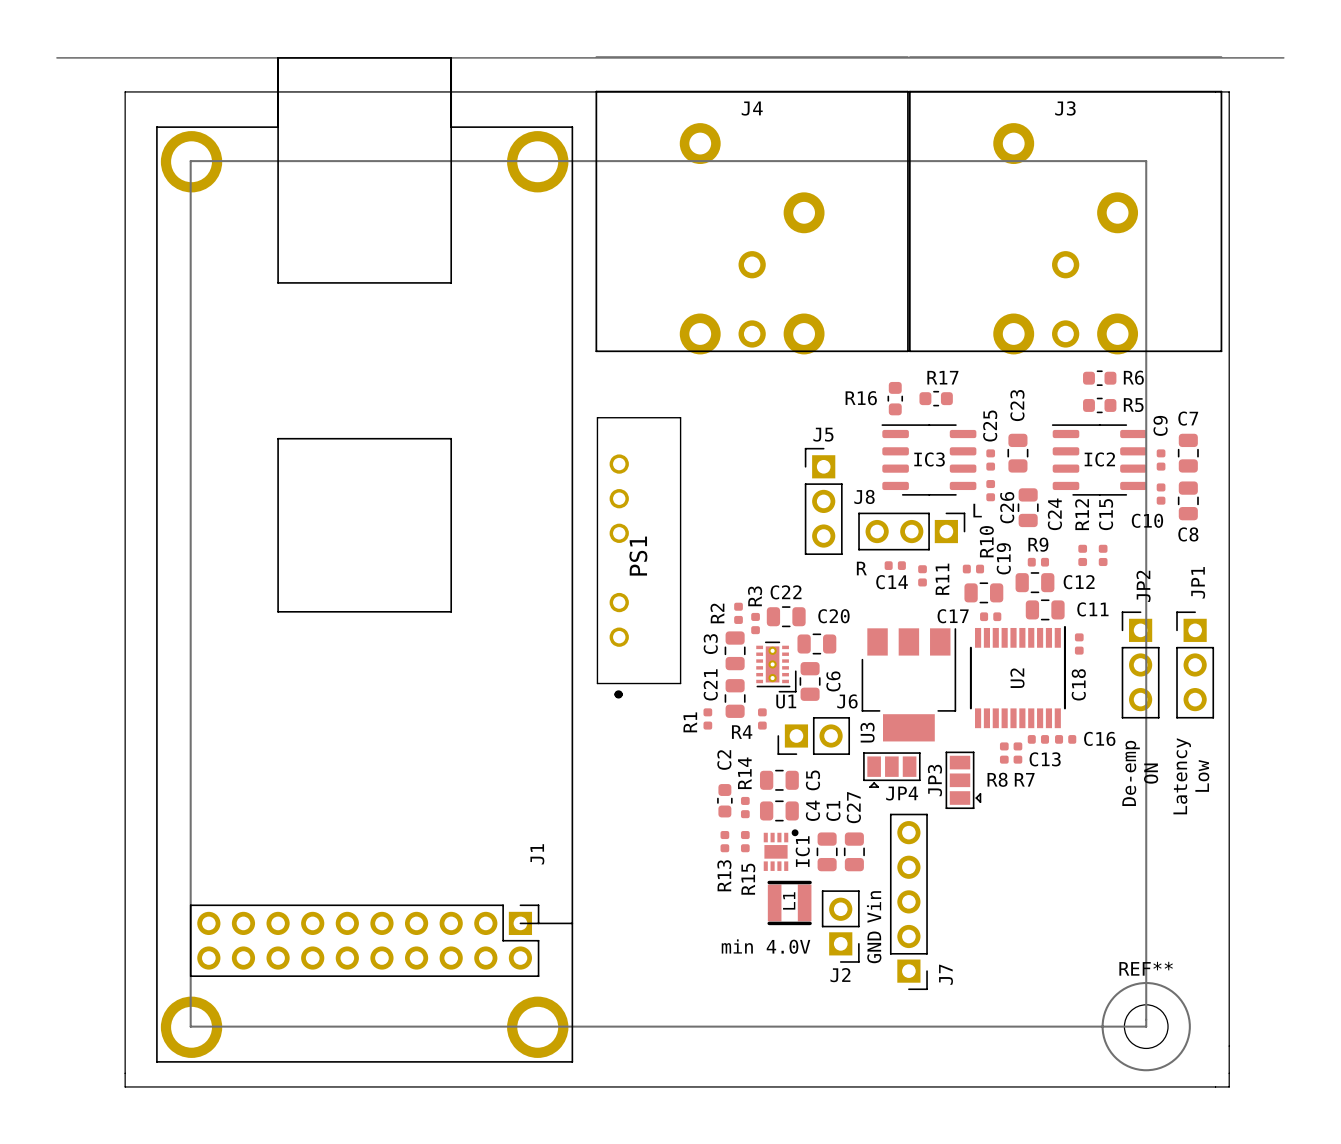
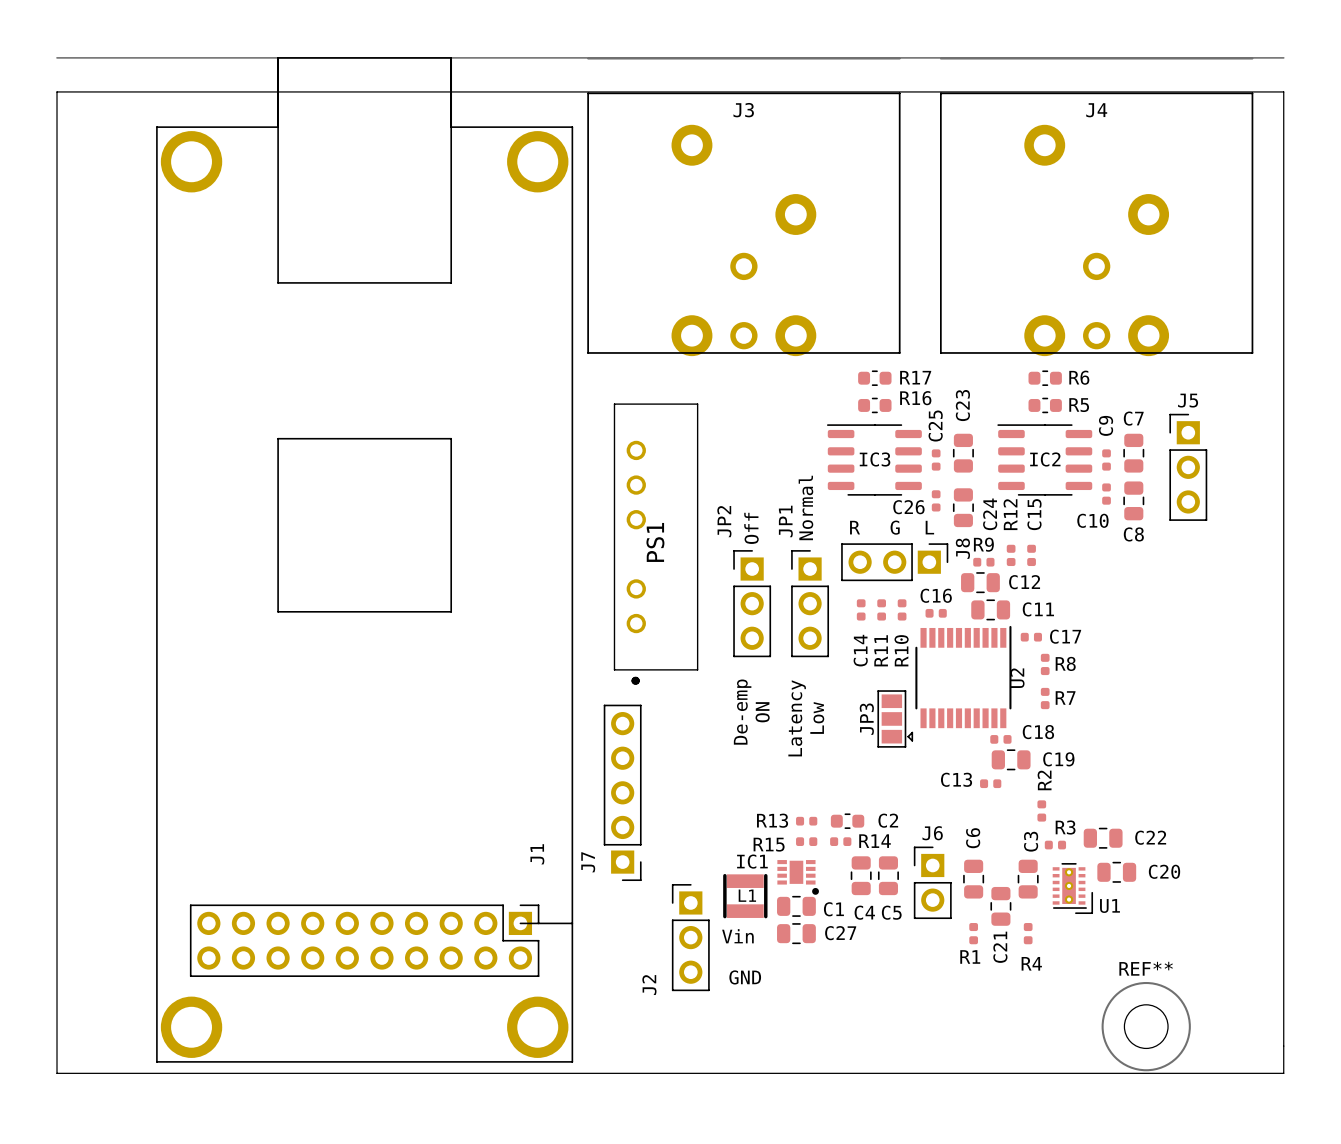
board edge: (125, 91) (125, 1086) (1229, 1086) (1229, 91) -> (125, 91) (57, 91) (57, 1073) (1283, 1073) (1283, 91) (1229, 91)
line: (190, 161) (190, 1026) (1146, 1026) (1146, 161) (190, 161) -> none
J4 position: (752, 205) -> (1096, 207)
J3 position: (1065, 205) -> (743, 207)
R17 name position: R17 (942, 377) -> R17 (915, 377)
R6 position: (1099, 378) -> (1045, 378)
R16 name position: R16 (861, 398) -> R16 (915, 398)
R16 rotation: 0° (895, 398) -> 90° clockwise (874, 405)
R16 position: (895, 398) -> (874, 405)
R17 position: (936, 398) -> (874, 378)
R5 position: (1099, 405) -> (1045, 405)
C23 position: (1017, 453) -> (963, 453)
C7 position: (1188, 453) -> (1133, 453)
IC3 position: (928, 459) -> (874, 459)
C25 position: (990, 459) -> (936, 459)
IC2 position: (1099, 459) -> (1044, 459)
C9 position: (1161, 459) -> (1106, 459)
C26 position: (990, 490) -> (936, 500)
C10 position: (1161, 494) -> (1106, 494)
J8 name rotation: 0° (864, 496) -> 90° counterclockwise (962, 548)
J8 name position: J8 (864, 496) -> J8 (962, 548)
C8 position: (1188, 500) -> (1133, 500)
J5 position: (823, 501) -> (1188, 467)
text: none -> Normal (805, 507)
C26 name rotation: 0° (1007, 507) -> 90° clockwise (908, 507)
C24 position: (1028, 507) -> (963, 507)
text position: L (977, 510) -> L (929, 527)
text: none -> G (895, 527)
text: none -> Off (751, 528)
J8 position: (911, 531) -> (894, 562)
R10 name position: R10 (986, 541) -> R10 (901, 650)
R12 position: (1082, 555) -> (1011, 555)
C15 position: (1103, 555) -> (1031, 555)
PS1 position: (639, 557) -> (656, 544)
C19 name rotation: 0° (1003, 558) -> 90° clockwise (1058, 759)
R9 position: (1038, 562) -> (983, 562)
C14 rotation: 0° (895, 565) -> 90° clockwise (861, 609)
C14 position: (895, 565) -> (861, 609)
text position: R (861, 568) -> R (855, 527)
R10 rotation: 0° (973, 569) -> 90° clockwise (902, 609)
R10 position: (973, 569) -> (902, 609)
R11 position: (922, 575) -> (881, 609)
R11 name position: R11 (942, 579) -> R11 (881, 650)
C12 position: (1034, 582) -> (980, 582)
JP1 name position: JP1 (1198, 582) -> JP1 (785, 521)
JP2 name position: JP2 (1143, 586) -> JP2 (724, 521)
C22 name position: C22 (786, 592) -> C22 (1150, 837)
C19 position: (983, 592) -> (1011, 759)
C11 position: (1045, 609) -> (990, 609)
R2 name position: R2 (717, 613) -> R2 (1044, 780)
R2 position: (738, 613) -> (1041, 810)
C22 position: (786, 616) -> (1103, 838)
C20 name position: C20 (833, 616) -> C20 (1164, 871)
C17 name position: C17 (953, 616) -> C17 (1065, 636)
C17 position: (990, 616) -> (1031, 637)
R3 rotation: 0° (755, 623) -> 90° clockwise (1055, 845)
R3 position: (755, 623) -> (1055, 845)
C20 position: (816, 643) -> (1116, 872)
C18 rotation: 0° (1079, 643) -> 90° clockwise (1000, 739)
C18 position: (1079, 643) -> (1000, 739)
C3 name position: C3 (710, 644) -> C3 (1031, 841)
C3 position: (735, 650) -> (1028, 879)
JP2 position: (1140, 664) -> (752, 603)
JP1 position: (1195, 664) -> (810, 603)
U1 position: (776, 667) -> (1072, 888)
U2 position: (1017, 677) -> (963, 677)
C6 position: (810, 681) -> (973, 879)
C6 name position: C6 (833, 681) -> C6 (973, 838)
C21 name position: C21 (710, 684) -> C21 (1000, 947)
U3: (908, 684) -> none
C18 name position: C18 (1078, 684) -> C18 (1038, 732)
C21 position: (735, 698) -> (1000, 906)
U1 name position: U1 (786, 701) -> U1 (1109, 906)
J6 name position: J6 (847, 701) -> J6 (932, 833)
text: none -> De-emp (742, 712)
text: none -> ON (762, 712)
text: none -> Low (817, 717)
R1 position: (707, 718) -> (973, 933)
R4 position: (762, 718) -> (1028, 933)
text: none -> Latency (797, 718)
R1 name rotation: 0° (690, 722) -> 90° clockwise (970, 956)
R4 name position: R4 (742, 732) -> R4 (1031, 963)
J6 rotation: 0° (813, 735) -> 90° clockwise (932, 882)
J6 position: (813, 735) -> (932, 882)
C16 name position: C16 (1099, 738) -> C16 (936, 595)
C13 position: (1038, 739) -> (990, 783)
C16 position: (1065, 739) -> (936, 613)
R8 position: (1004, 753) -> (1045, 664)
R7 position: (1017, 753) -> (1045, 698)
C13 name position: C13 (1045, 759) -> C13 (956, 779)
JP4: (891, 770) -> none
text: De-emp (1131, 773) -> none
text: ON (1151, 773) -> none
text: Low (1202, 775) -> none
text: Latency (1182, 776) -> none
R8 name position: R8 (997, 779) -> R8 (1065, 663)
R7 name position: R7 (1024, 779) -> R7 (1065, 698)
C5 rotation: 0° (779, 780) -> 90° clockwise (888, 875)
C5 position: (779, 780) -> (888, 875)
JP3 position: (963, 780) -> (895, 718)
C2 rotation: 0° (724, 800) -> 90° clockwise (847, 821)
C2 position: (724, 800) -> (847, 821)
R14 rotation: 0° (745, 807) -> 90° clockwise (840, 841)
R14 position: (745, 807) -> (840, 841)
C4 rotation: 0° (779, 810) -> 90° clockwise (861, 875)
C4 position: (779, 810) -> (861, 875)
R13 rotation: 0° (724, 841) -> 90° clockwise (806, 821)
R13 position: (724, 841) -> (806, 821)
R15 rotation: 0° (745, 841) -> 90° clockwise (806, 841)
R15 position: (745, 841) -> (806, 841)
IC1 rotation: 0° (781, 850) -> 90° clockwise (798, 877)
IC1 position: (781, 850) -> (798, 877)
IC1 name position: IC1 (802, 851) -> IC1 (752, 861)
C1 rotation: 0° (827, 851) -> 90° clockwise (796, 906)
C1 position: (827, 851) -> (796, 906)
C27 rotation: 0° (854, 851) -> 90° clockwise (796, 933)
C27 position: (854, 851) -> (796, 933)
J2 footprint: [821, 890, 860, 963] -> [671, 884, 710, 992]
J7 position: (908, 901) -> (622, 792)
L1 rotation: 0° (789, 902) -> 90° clockwise (745, 896)
L1 position: (789, 902) -> (745, 896)
text rotation: 0° (874, 906) -> 90° clockwise (737, 936)
text position: Vin (874, 906) -> Vin (737, 936)
text: min 4.0V (766, 946) -> none
text rotation: 0° (874, 947) -> 90° clockwise (745, 977)
text position: GND (874, 947) -> GND (745, 977)
J7 name position: J7 (946, 974) -> J7 (588, 862)
J2 name position: J2 (840, 975) -> J2 (649, 985)

